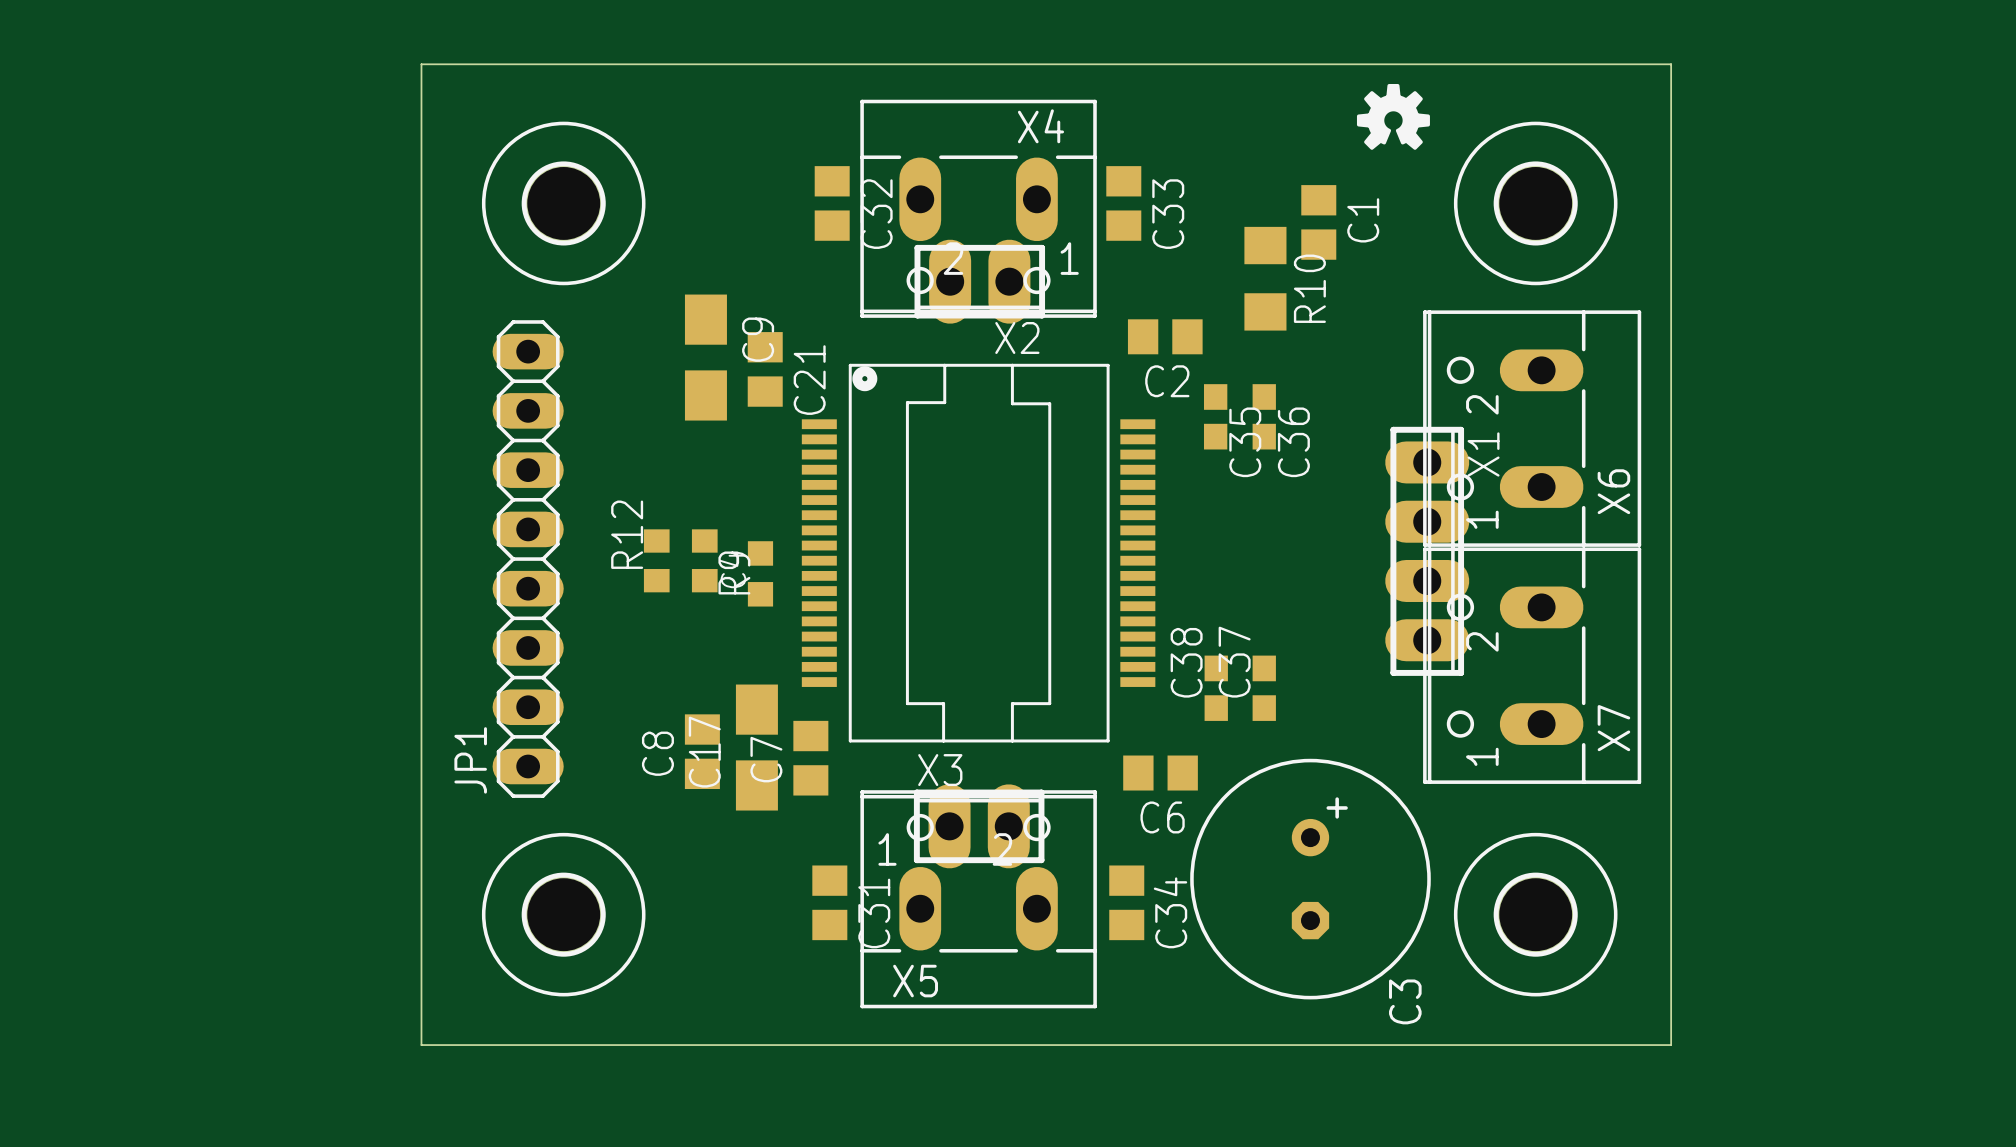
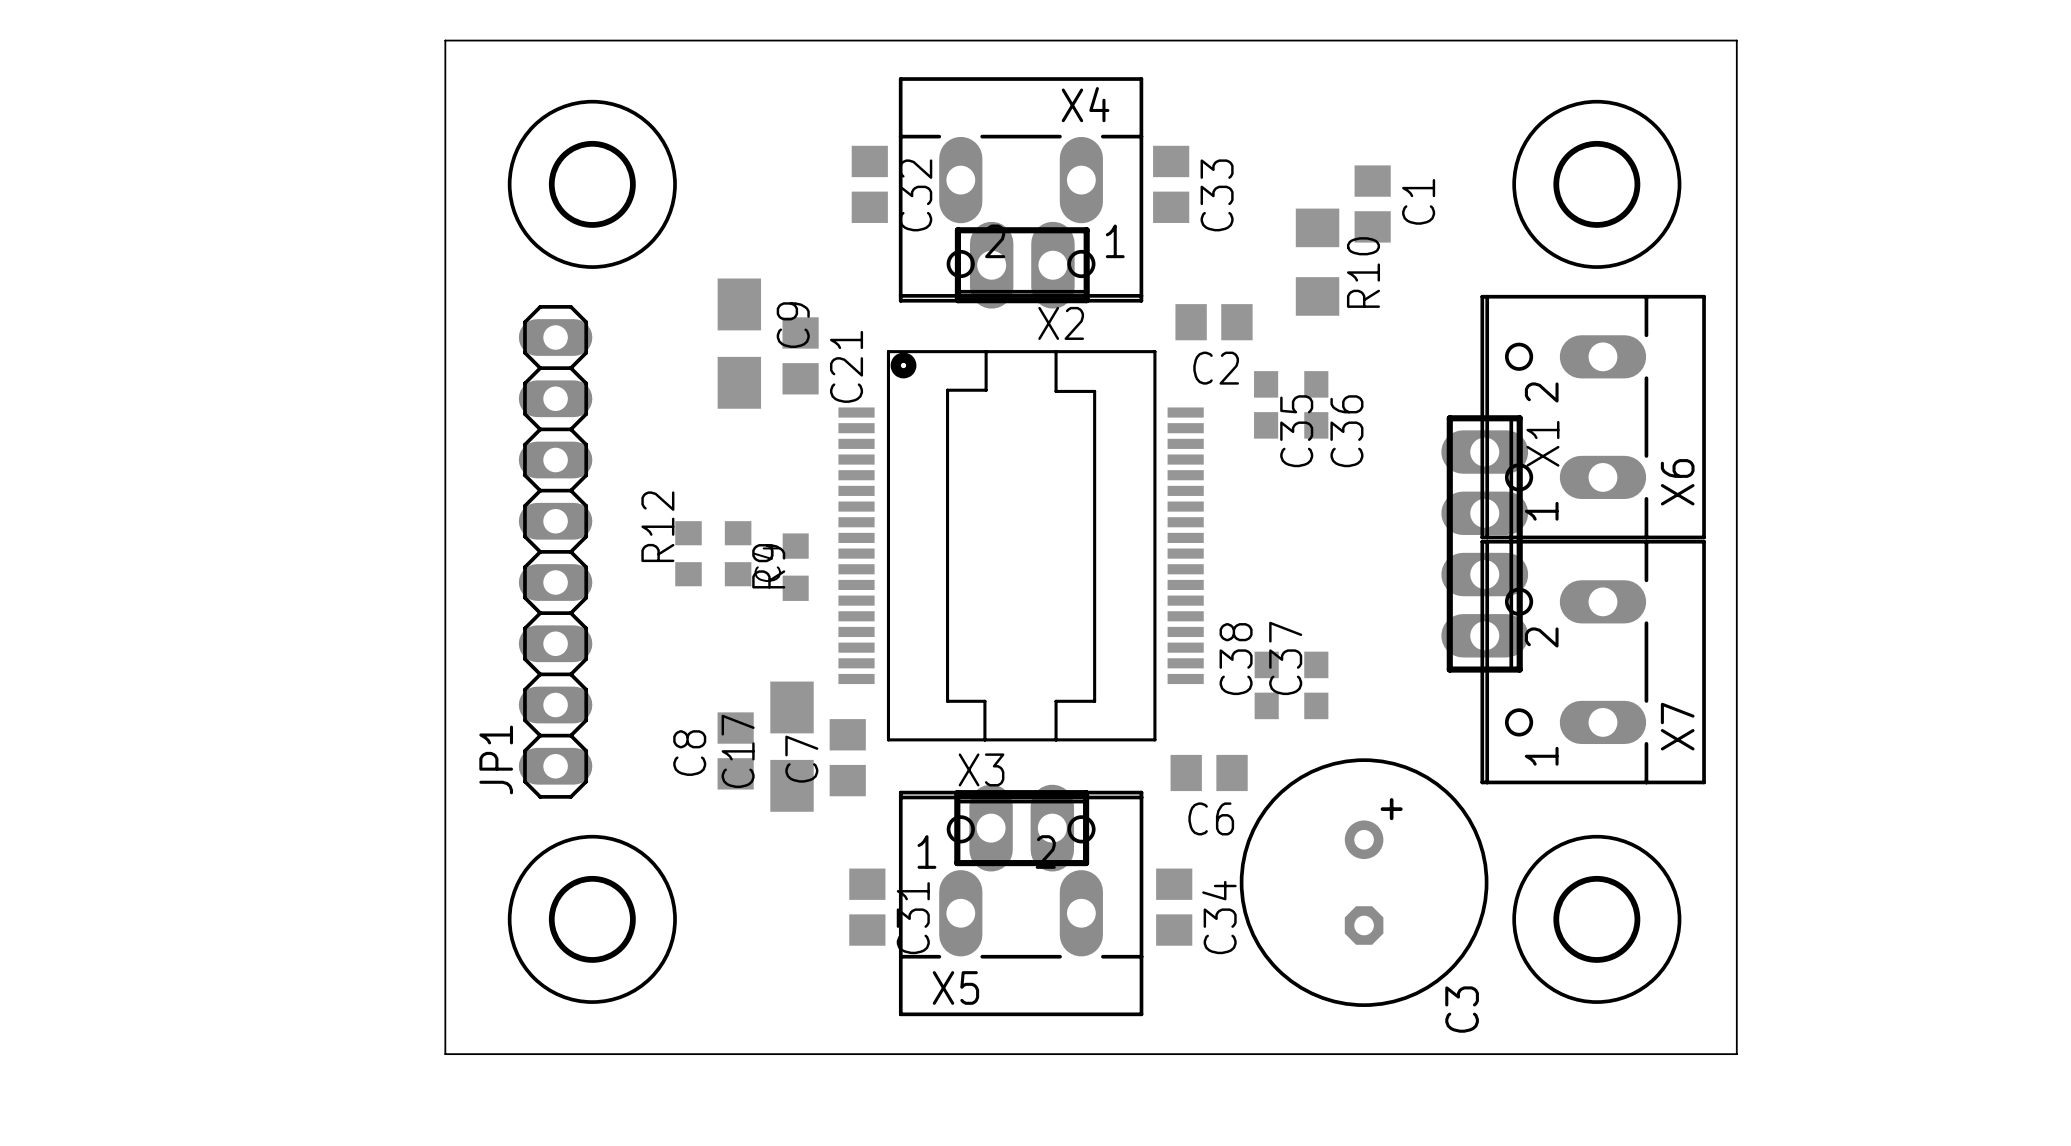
drawing: [1356, 83, 1430, 150] -> none

